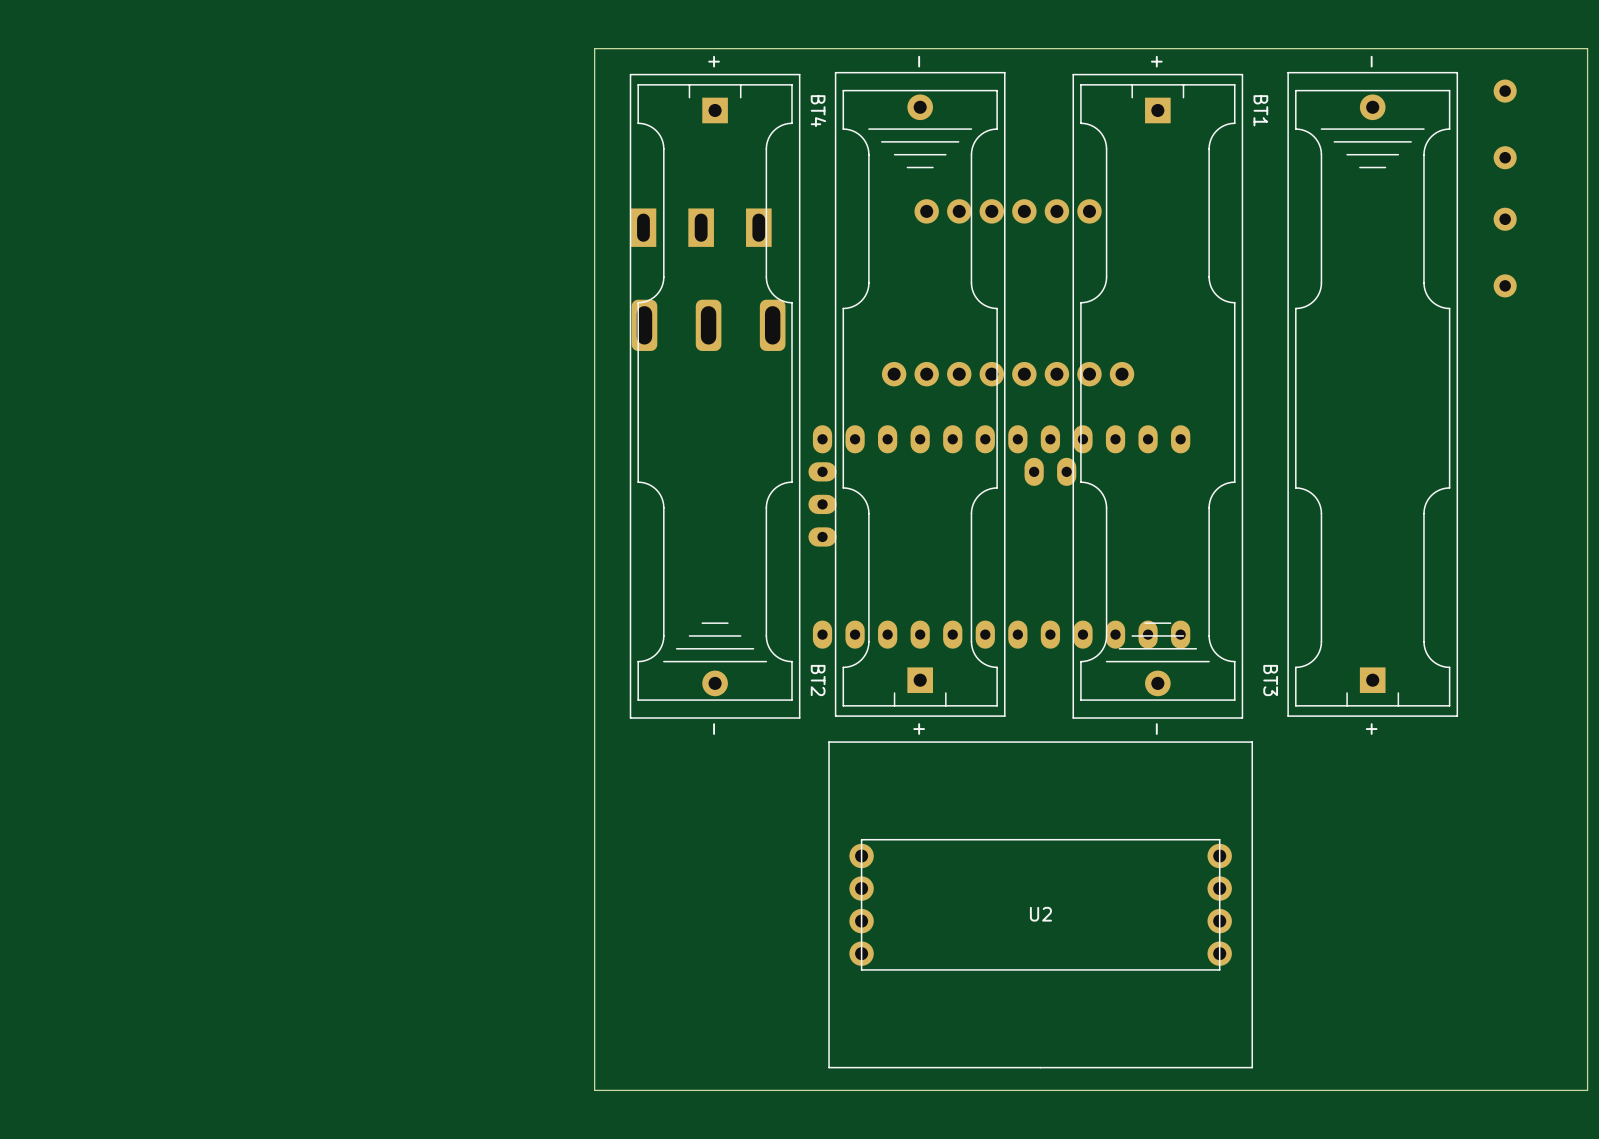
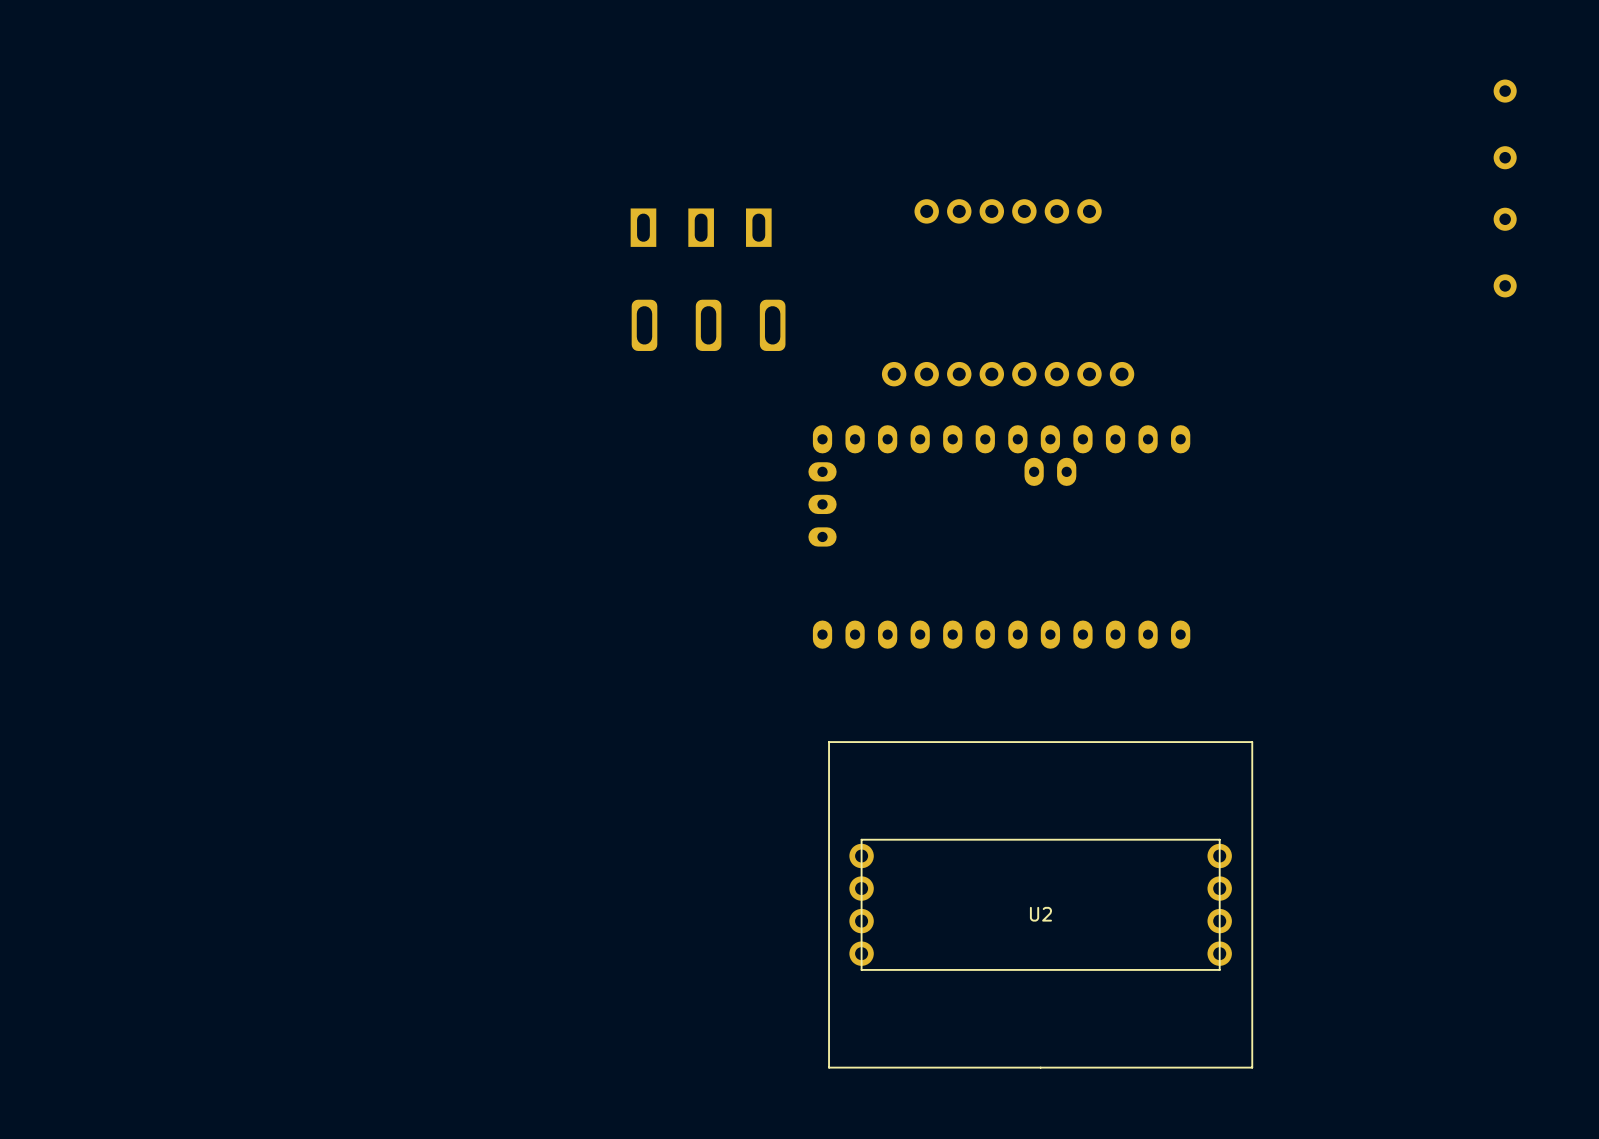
board edge: (1587, 48) (1587, 1090) (594, 1090) (594, 48) (1587, 48) -> none
BT2: (920, 394) -> none
BT3: (1372, 394) -> none
BT4: (715, 396) -> none
BT1: (1157, 396) -> none

